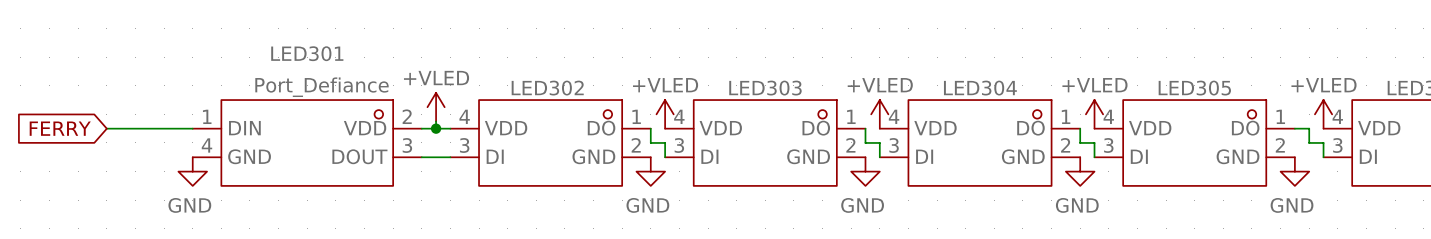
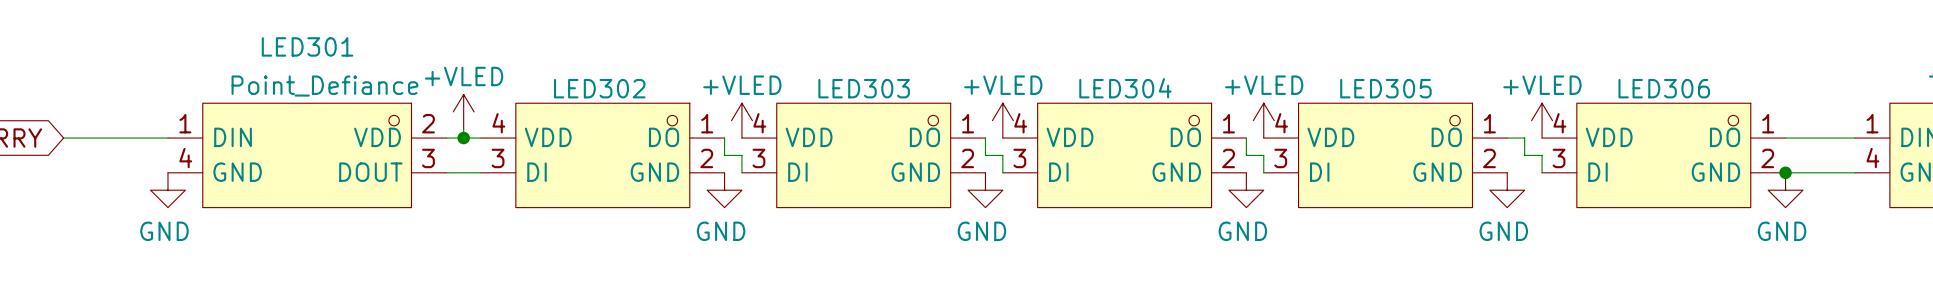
LED301 text: Port_Defiance (322, 87) -> Point_Defiance (324, 86)

